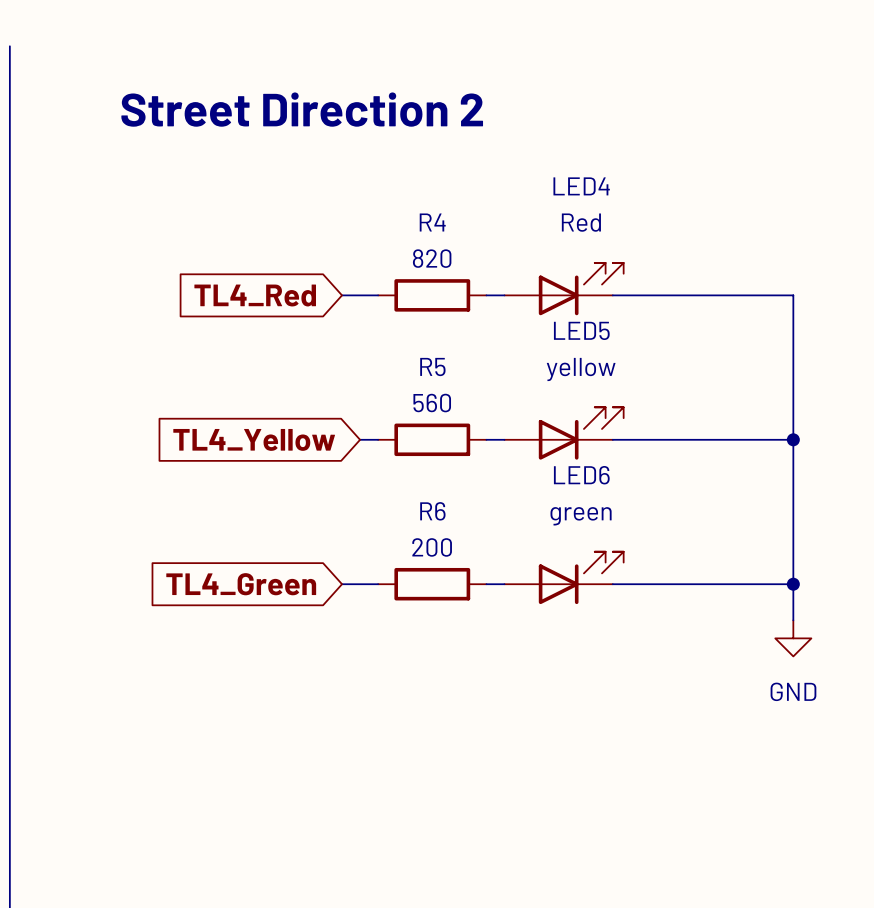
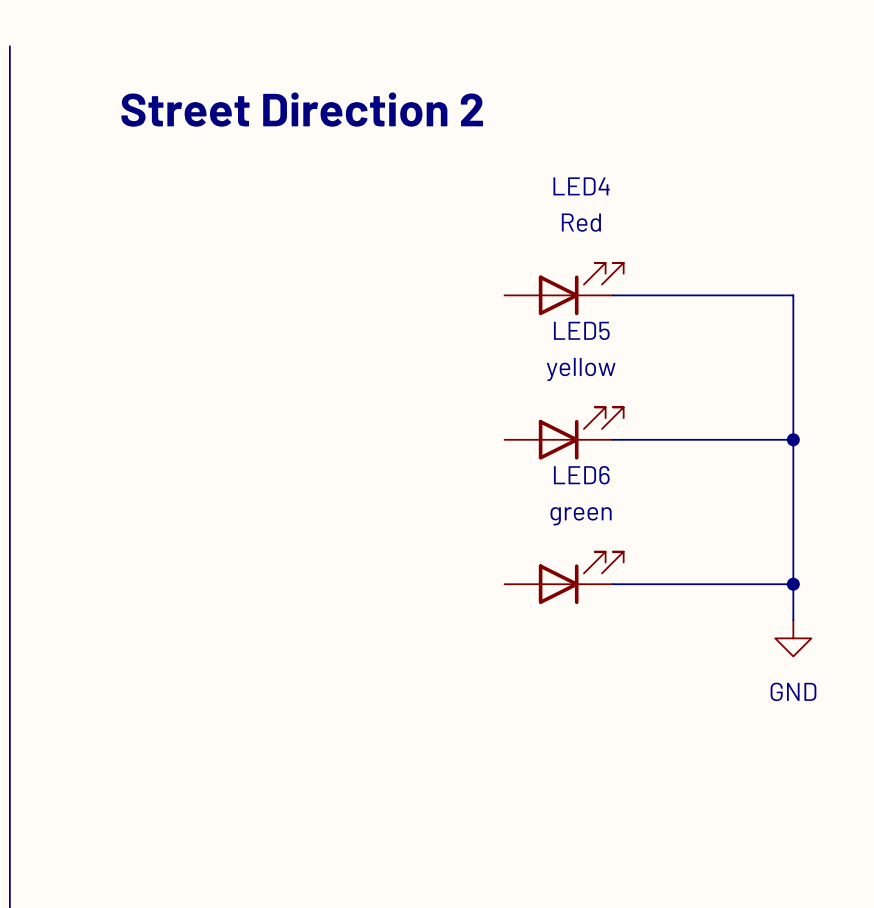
global label: TL4_Red (255, 295) -> none
wire: (342, 295) (378, 295) -> none
R4: 820 (432, 295) -> none
wire: (486, 295) (504, 295) -> none
global label: TL4_Yellow (254, 439) -> none
wire: (360, 439) (378, 439) -> none
R5: 560 (432, 439) -> none
wire: (486, 439) (504, 439) -> none
global label: TL4_Green (241, 584) -> none
wire: (342, 584) (378, 584) -> none
R6: 200 (432, 584) -> none
wire: (486, 584) (504, 584) -> none

